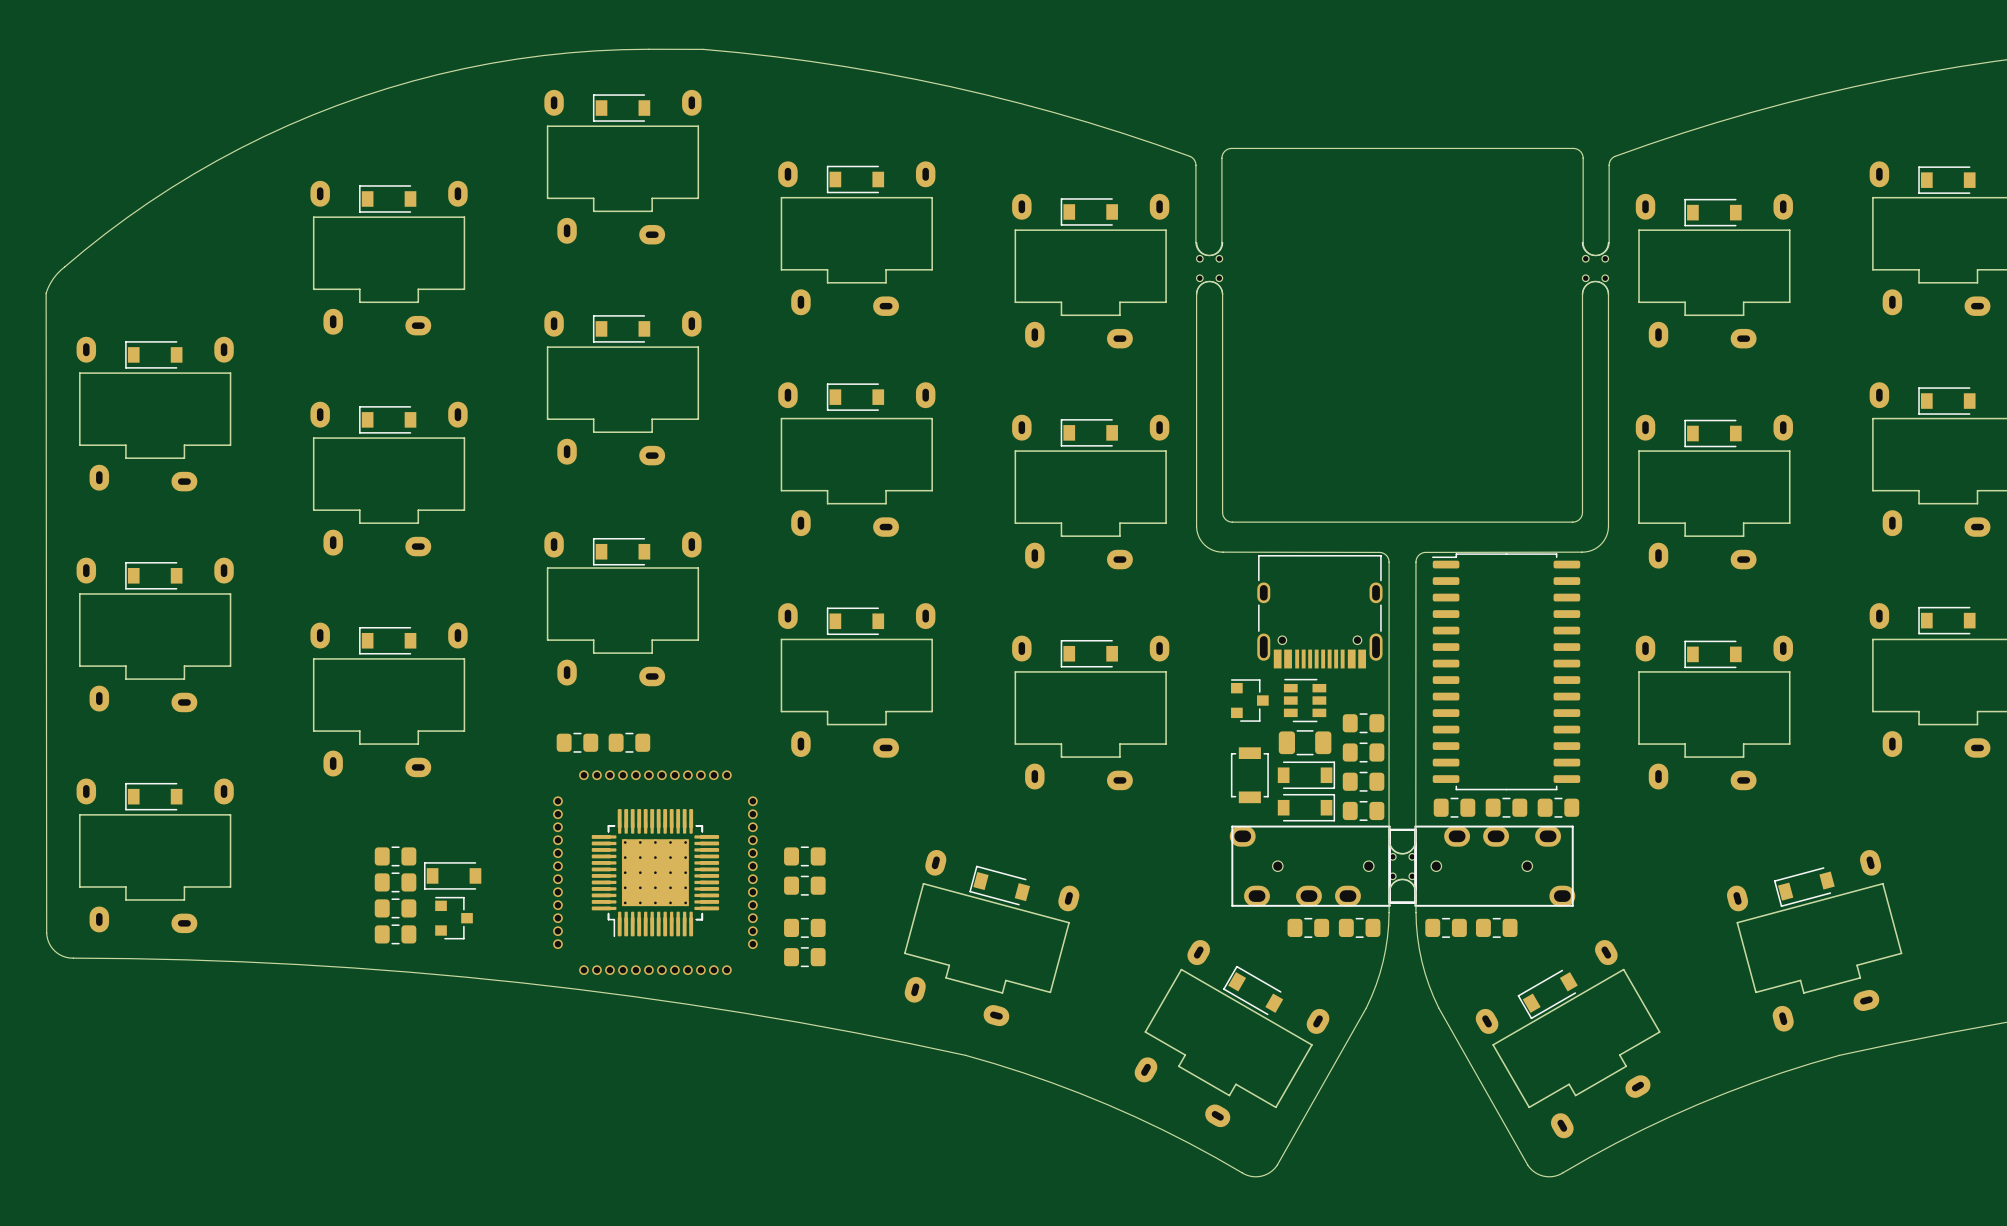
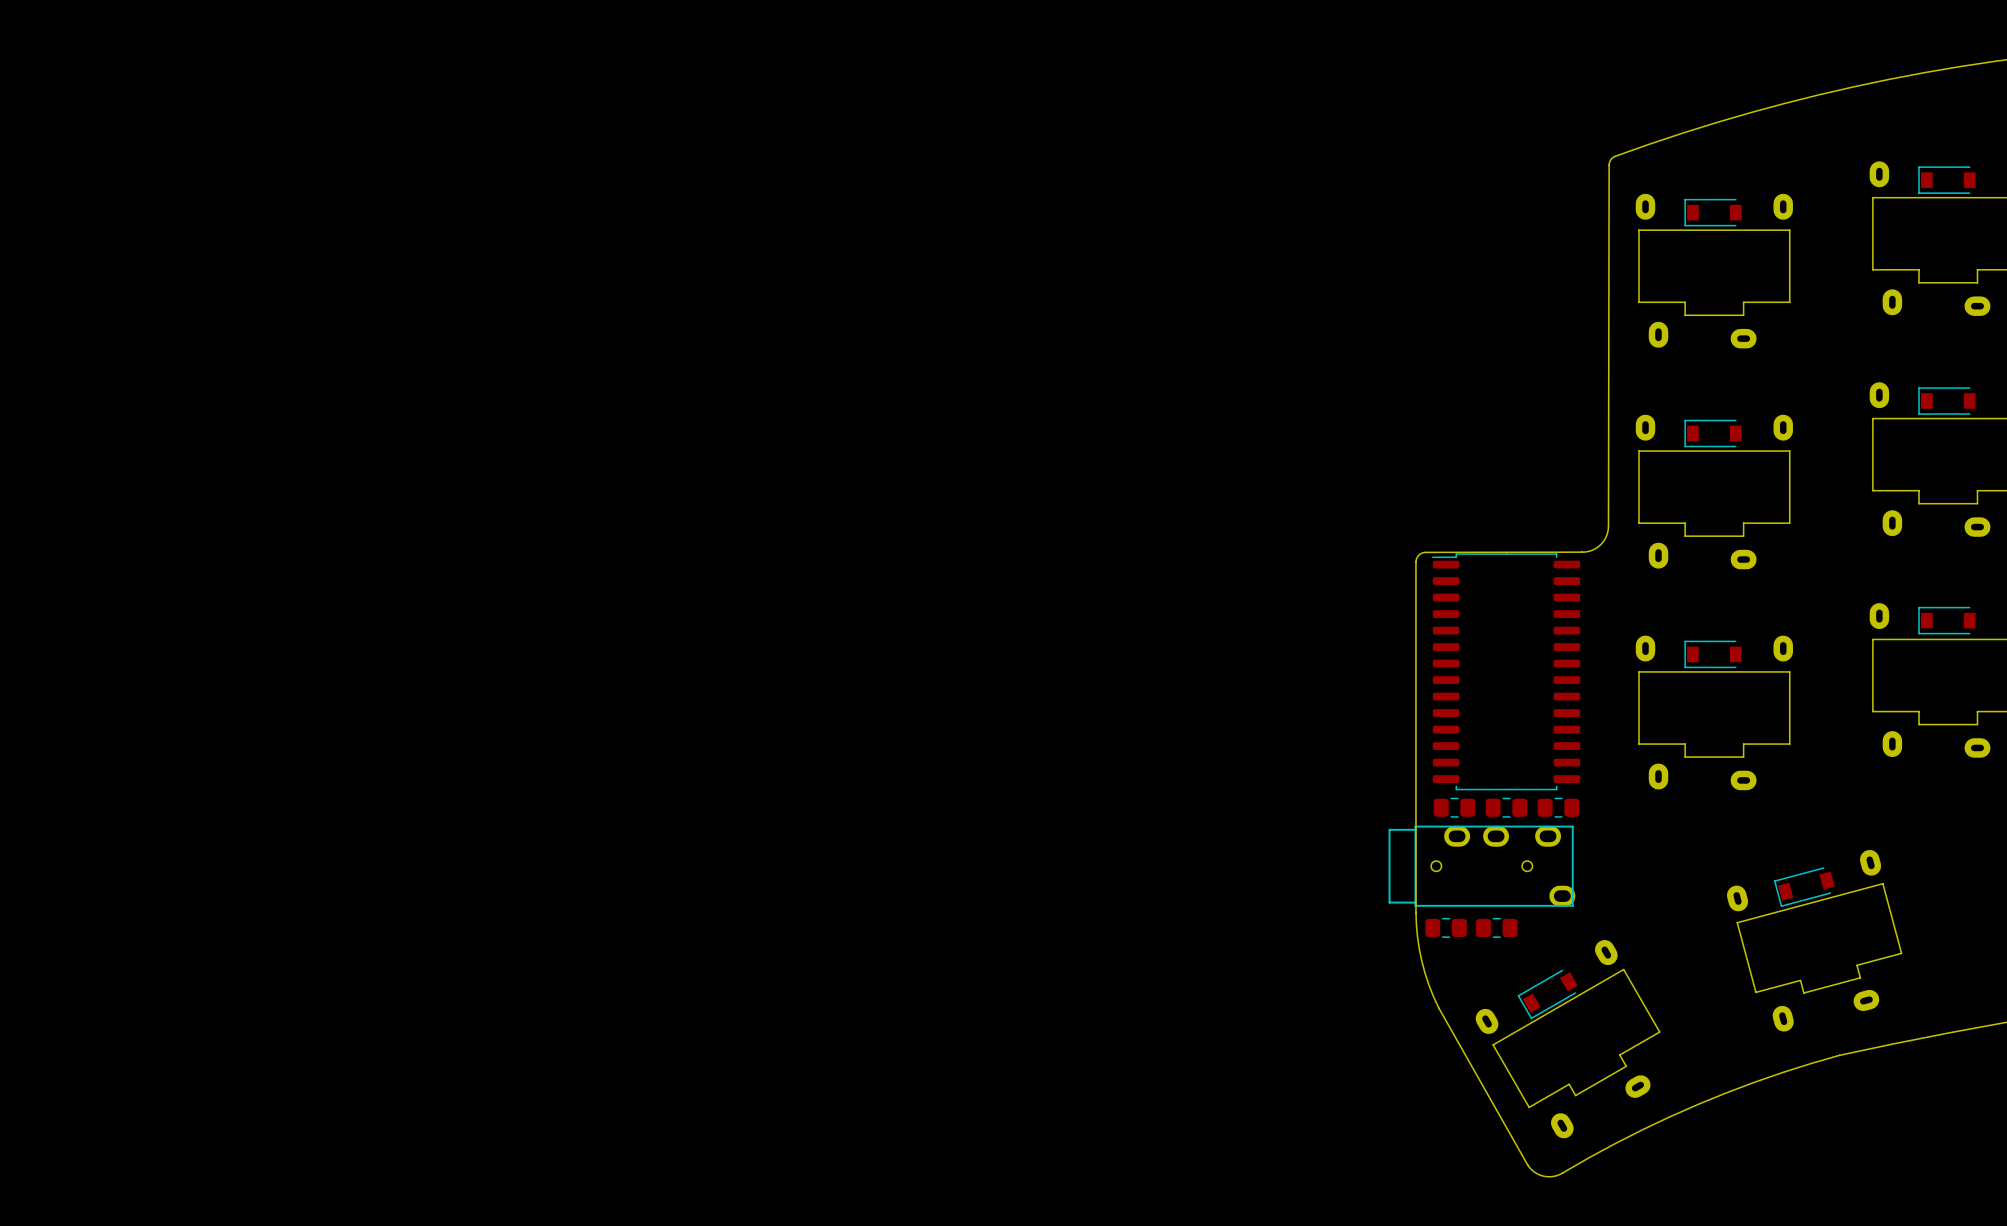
part: (621, 108) -> none
board edge: (1609, 165) (1609, 244) (1604, 252) (1596, 255) (1588, 253) (1583, 245) (1583, 156) (1580, 151) (1575, 148) (1229, 148) (1224, 151) (1222, 156) (1221, 245) (1216, 253) (1207, 255) (1199, 251) (1196, 244) (1194, 161) (1190, 156) (1156, 144) (1019, 103) (950, 86) (845, 66) (703, 49) (595, 50) (516, 59) (438, 74) (387, 88) (312, 115) (263, 136) (193, 174) (127, 217) (64, 267) -> (1609, 165) (1608, 527)
part: (622, 167) -> none
part: (855, 179) -> none
part: (387, 198) -> none
part: (1089, 211) -> none
part: (856, 238) -> none
part: (389, 258) -> none
board edge: (64, 267) (53, 278) (46, 293) (46, 933) (50, 945) (60, 955) (70, 958) (298, 964) (466, 977) (577, 989) (689, 1004) (855, 1032) (965, 1055) (1051, 1082) (1135, 1116) (1189, 1143) (1244, 1174) (1255, 1176) (1266, 1174) (1277, 1164) (1366, 1007) (1383, 961) (1388, 924) (1389, 890) (1395, 881) (1405, 879) (1414, 885) (1415, 912) -> none
part: (1209, 268) -> none
part: (1595, 268) -> none
part: (1090, 271) -> none
part: (621, 328) -> none
part: (153, 354) -> none
part: (622, 388) -> none
part: (855, 397) -> none
part: (155, 414) -> none
part: (387, 419) -> none
part: (1089, 432) -> none
part: (856, 459) -> none
part: (389, 478) -> none
part: (1090, 491) -> none
board edge: (1608, 527) (1608, 294) (1606, 287) (1601, 283) (1590, 282) (1585, 286) (1582, 292) (1582, 512) (1579, 519) (1572, 522) (1227, 520) (1222, 512) (1222, 292) (1219, 286) (1214, 282) (1207, 281) (1201, 284) (1196, 294) (1197, 533) (1204, 545) (1219, 551) (1379, 552) (1387, 557) (1389, 841) (1393, 850) (1402, 854) (1411, 850) (1415, 842) (1415, 562) -> (1415, 912) (1415, 562)
part: (621, 551) -> none
part: (153, 575) -> none
part: (622, 608) -> none
part: (1319, 611) -> none
part: (855, 621) -> none
part: (155, 634) -> none
part: (387, 640) -> none
part: (1089, 653) -> none
part: (856, 680) -> none
part: (389, 699) -> none
part: (1249, 700) -> none
part: (1305, 700) -> none
part: (1090, 712) -> none
part: (1363, 723) -> none
part: (577, 742) -> none
part: (629, 742) -> none
part: (1305, 742) -> none
part: (1363, 752) -> none
part: (1249, 775) -> none
part: (1306, 775) -> none
part: (1363, 781) -> none
part: (153, 796) -> none
part: (1306, 807) -> none
part: (1363, 810) -> none
part: (155, 855) -> none
part: (395, 856) -> none
part: (804, 856) -> none
part: (1323, 866) -> none
part: (1402, 866) -> none
part: (655, 872) -> none
part: (452, 875) -> none
part: (395, 882) -> none
part: (804, 885) -> none
part: (999, 885) -> none
part: (395, 908) -> none
part: (453, 918) -> none
part: (804, 927) -> none
part: (1308, 927) -> none
part: (1359, 927) -> none
part: (395, 934) -> none
part: (991, 938) -> none
part: (804, 957) -> none
part: (1253, 990) -> none
part: (1232, 1033) -> none

